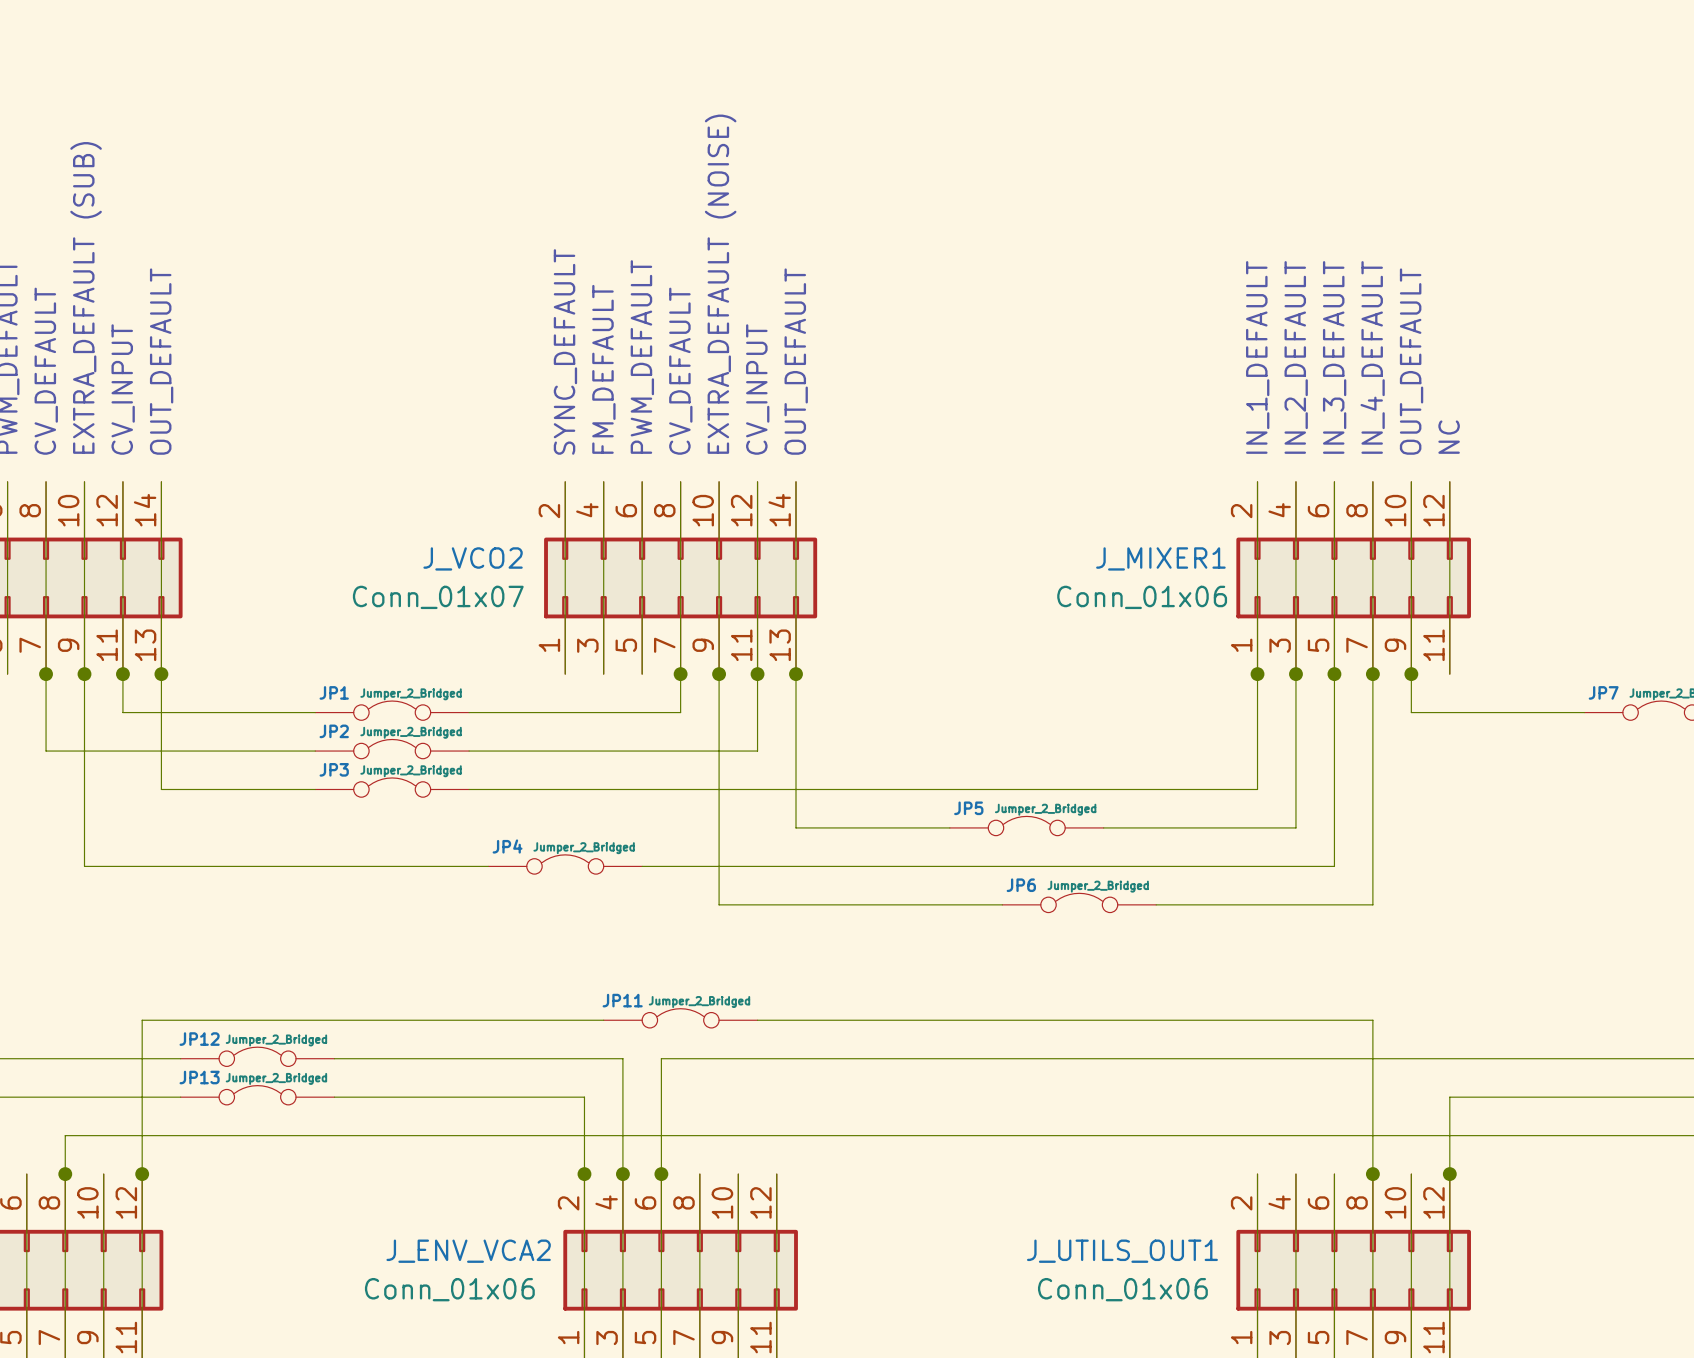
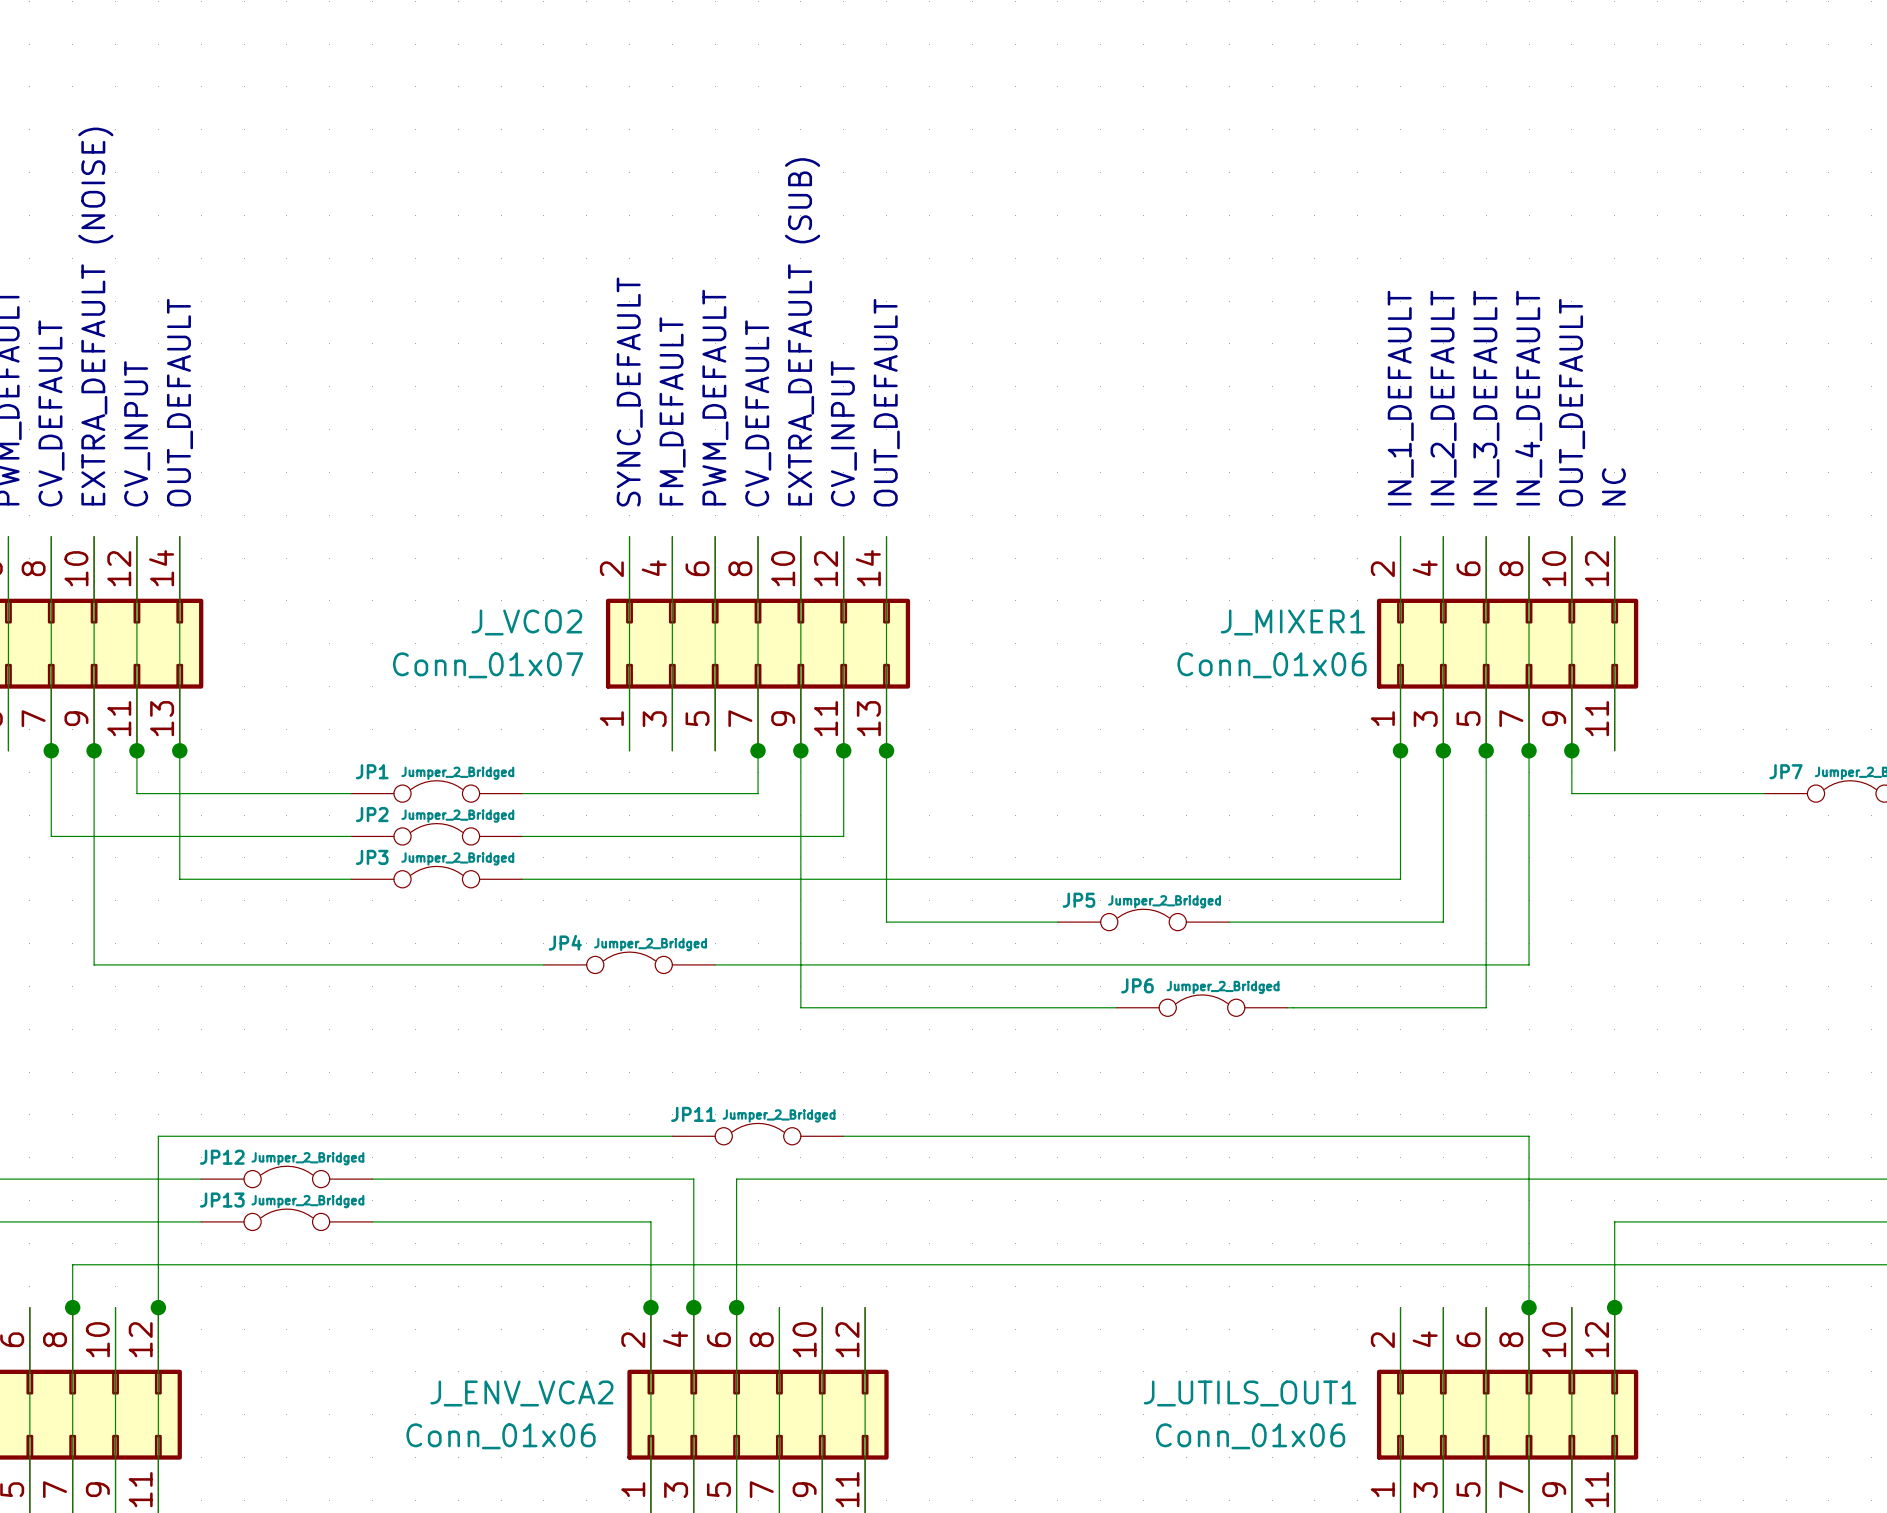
text: EXTRA_DEFAULT (NOISE) (720, 284) -> EXTRA_DEFAULT (SUB) (802, 331)
text: EXTRA_DEFAULT (SUB) (86, 297) -> EXTRA_DEFAULT (NOISE) (95, 316)
wire: (1372, 866) (1372, 904) (1334, 904) -> (1529, 964) (1486, 964) (1486, 1007)

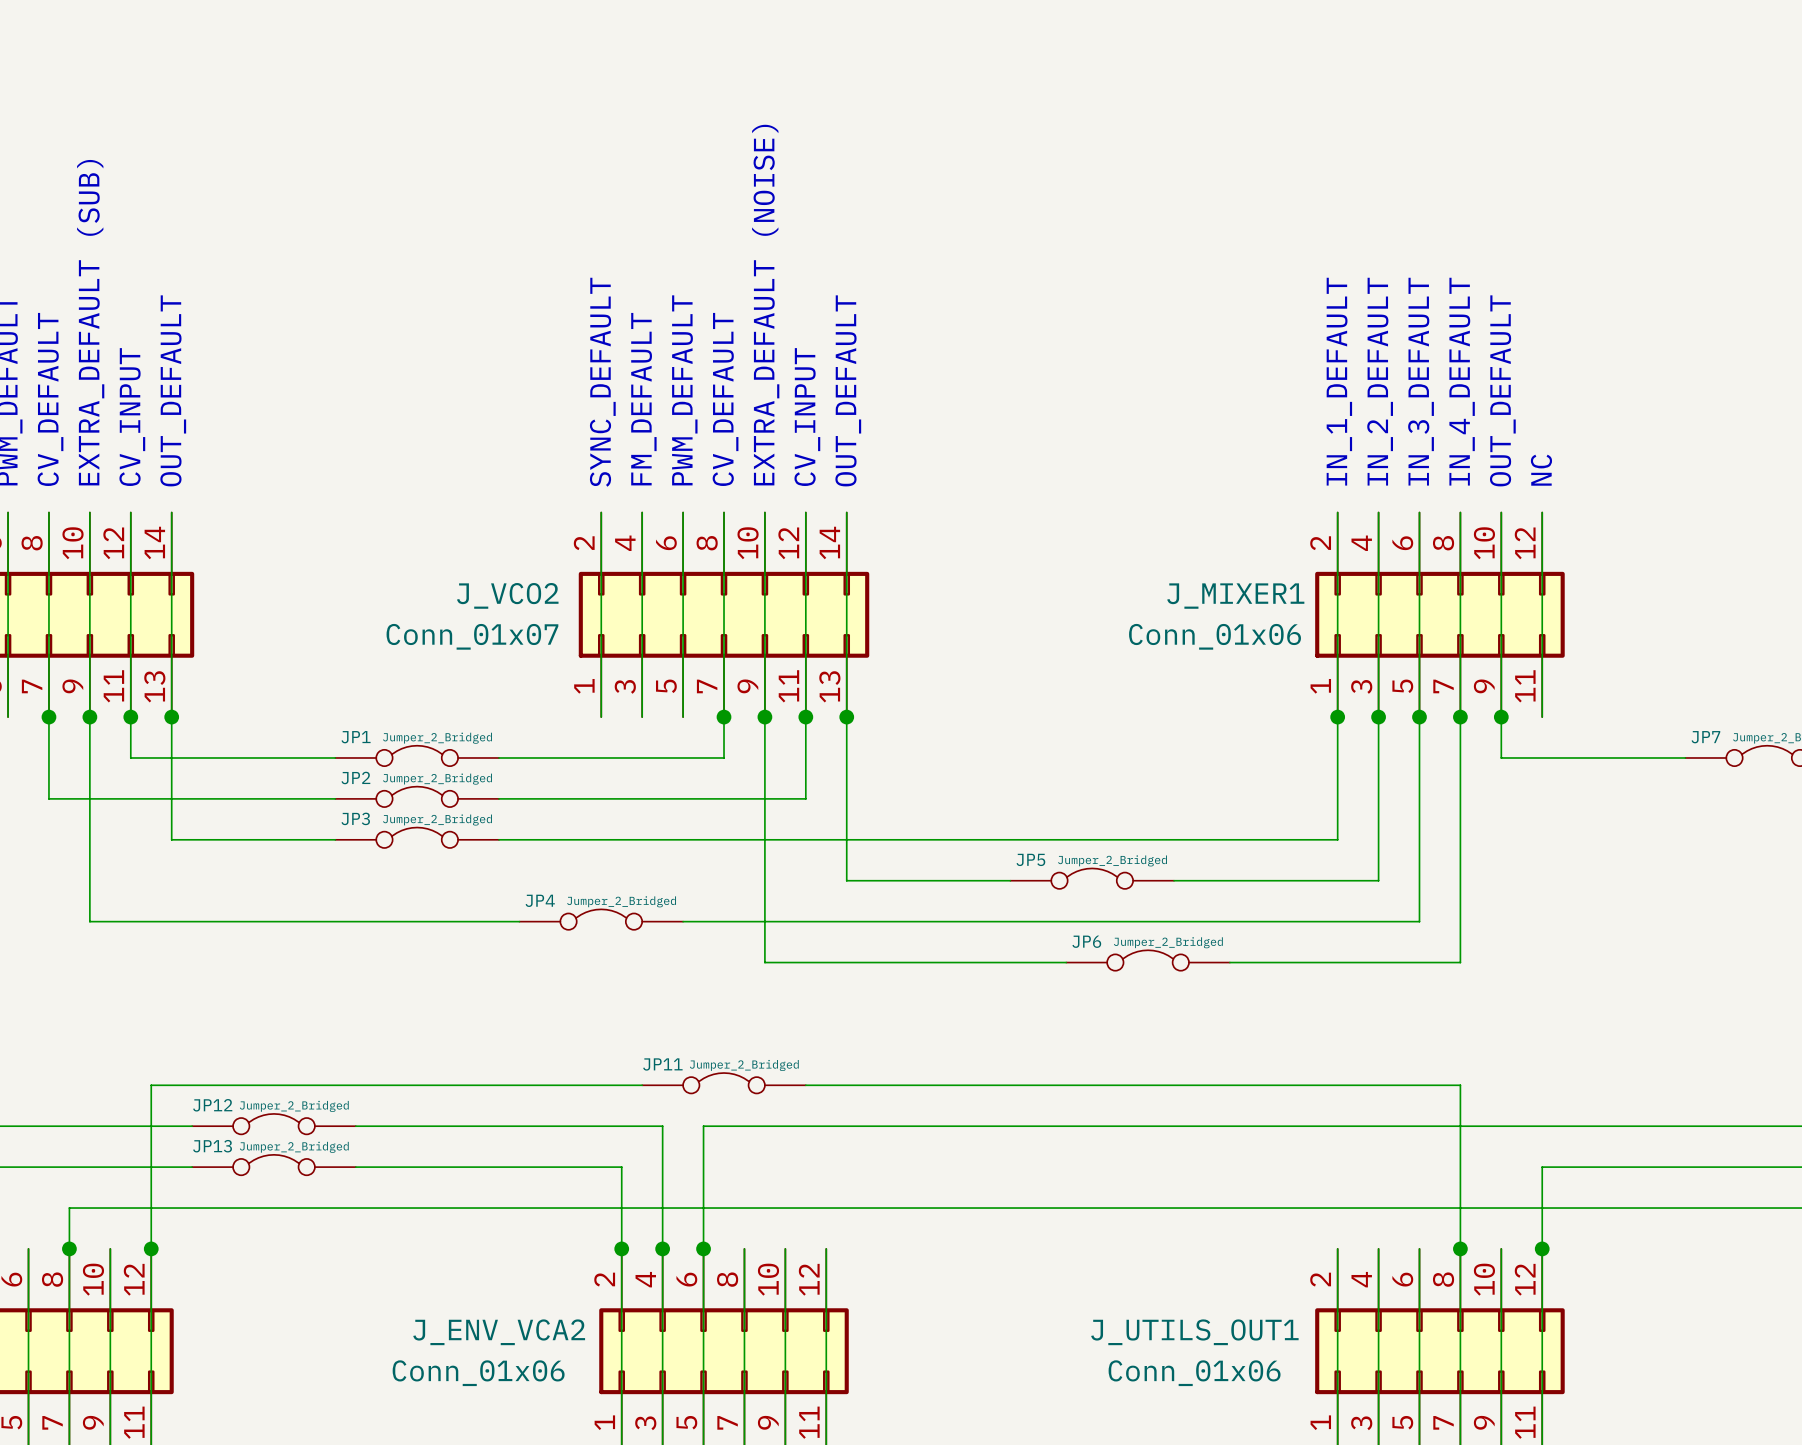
text: EXTRA_DEFAULT (NOISE) (95, 316) -> EXTRA_DEFAULT (SUB) (90, 322)
text: EXTRA_DEFAULT (SUB) (802, 331) -> EXTRA_DEFAULT (NOISE) (765, 305)
wire: (1529, 964) (1486, 964) (1486, 1007) -> (1460, 921) (1460, 962) (1419, 962)

